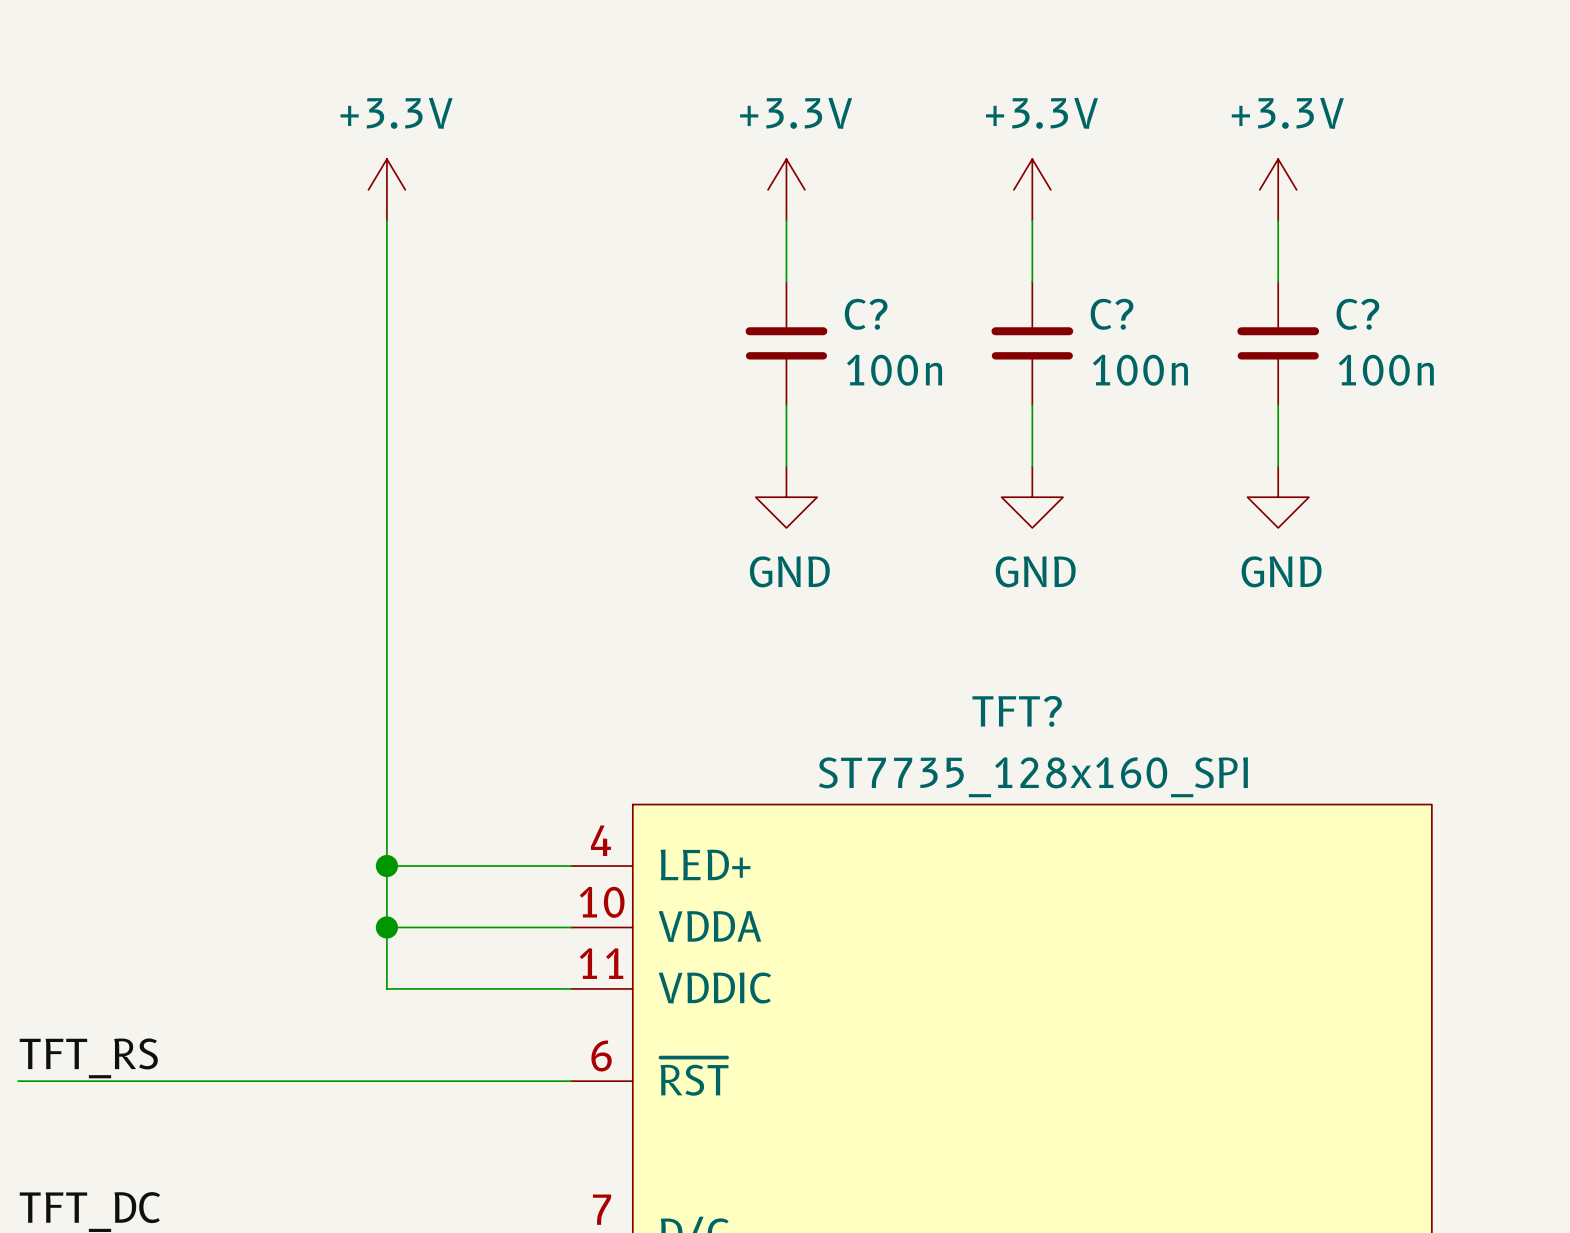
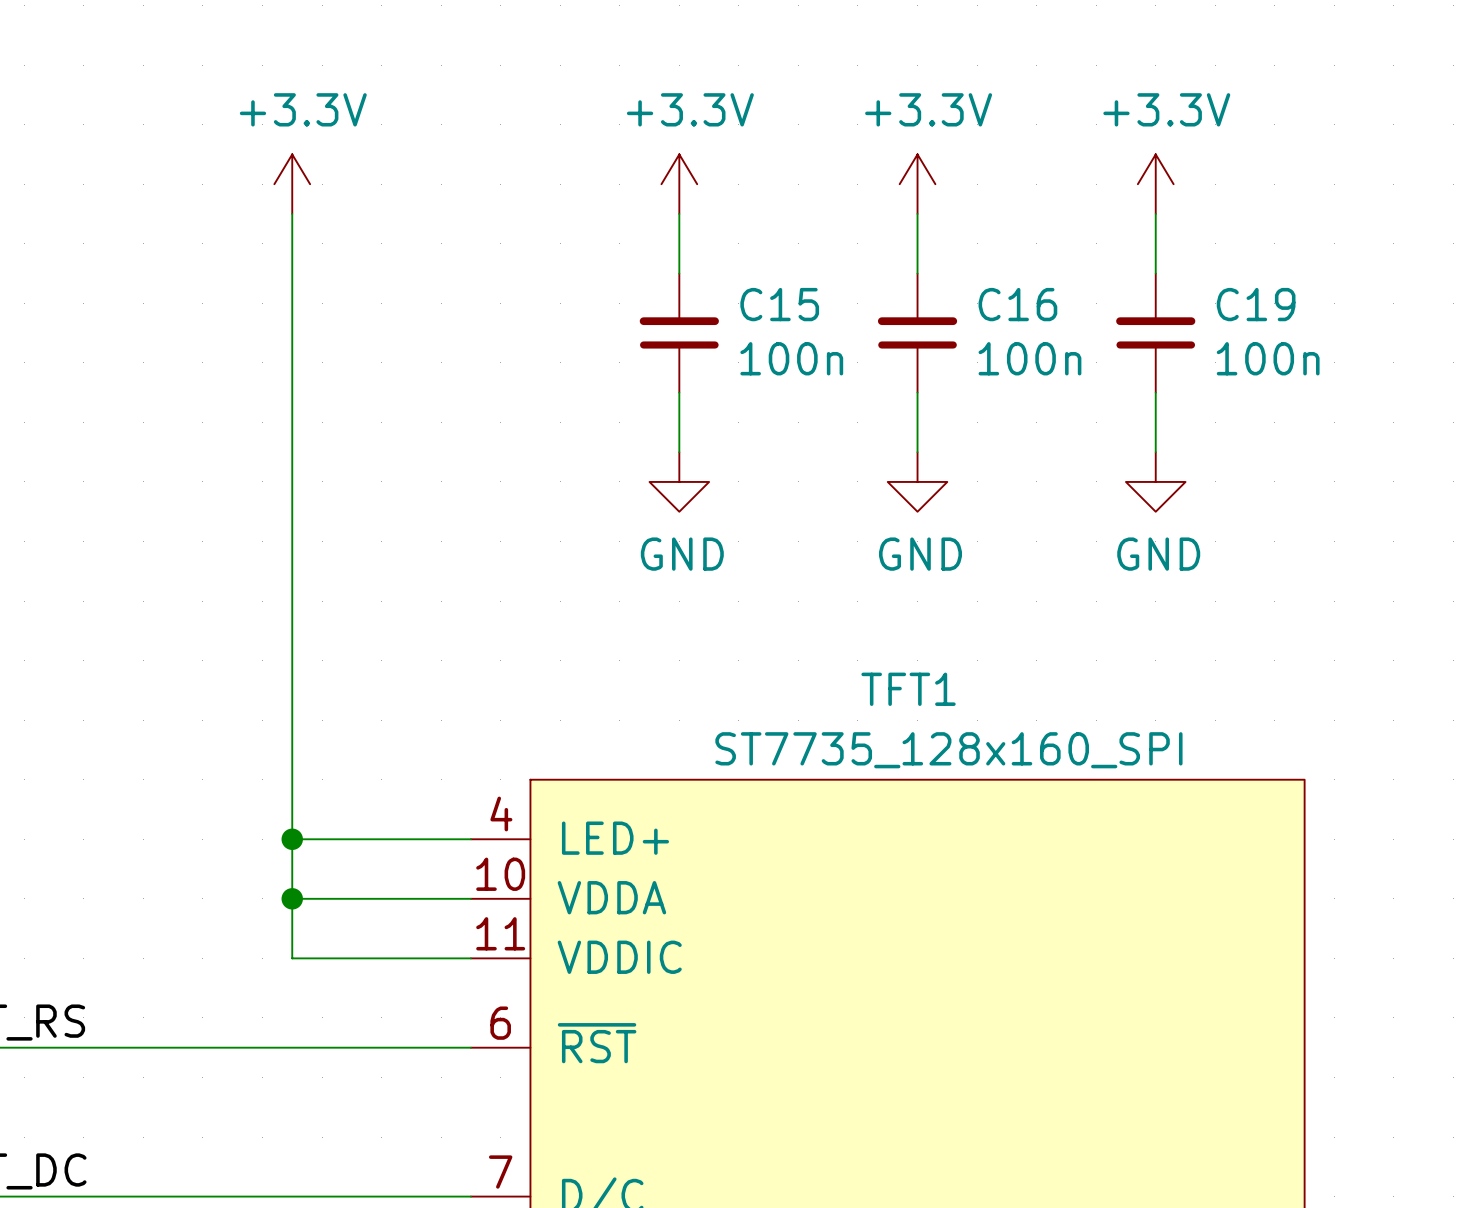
C? name: C? (866, 314) -> C15 (779, 304)
C? name: C? (1112, 314) -> C16 (1017, 304)
C? name: C? (1357, 314) -> C19 (1256, 304)
TFT? name: TFT? (1017, 711) -> TFT1 (908, 689)

